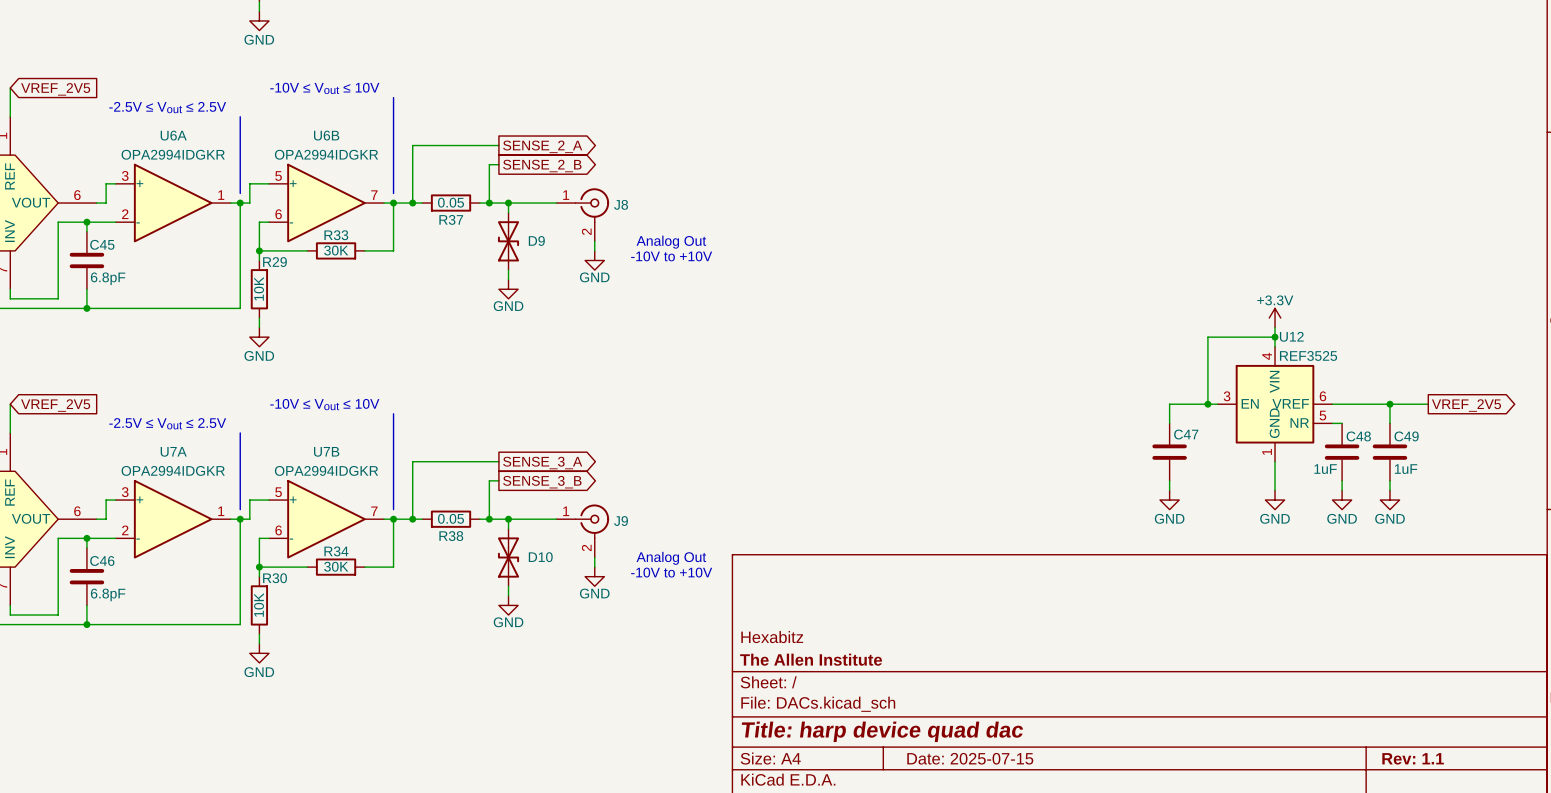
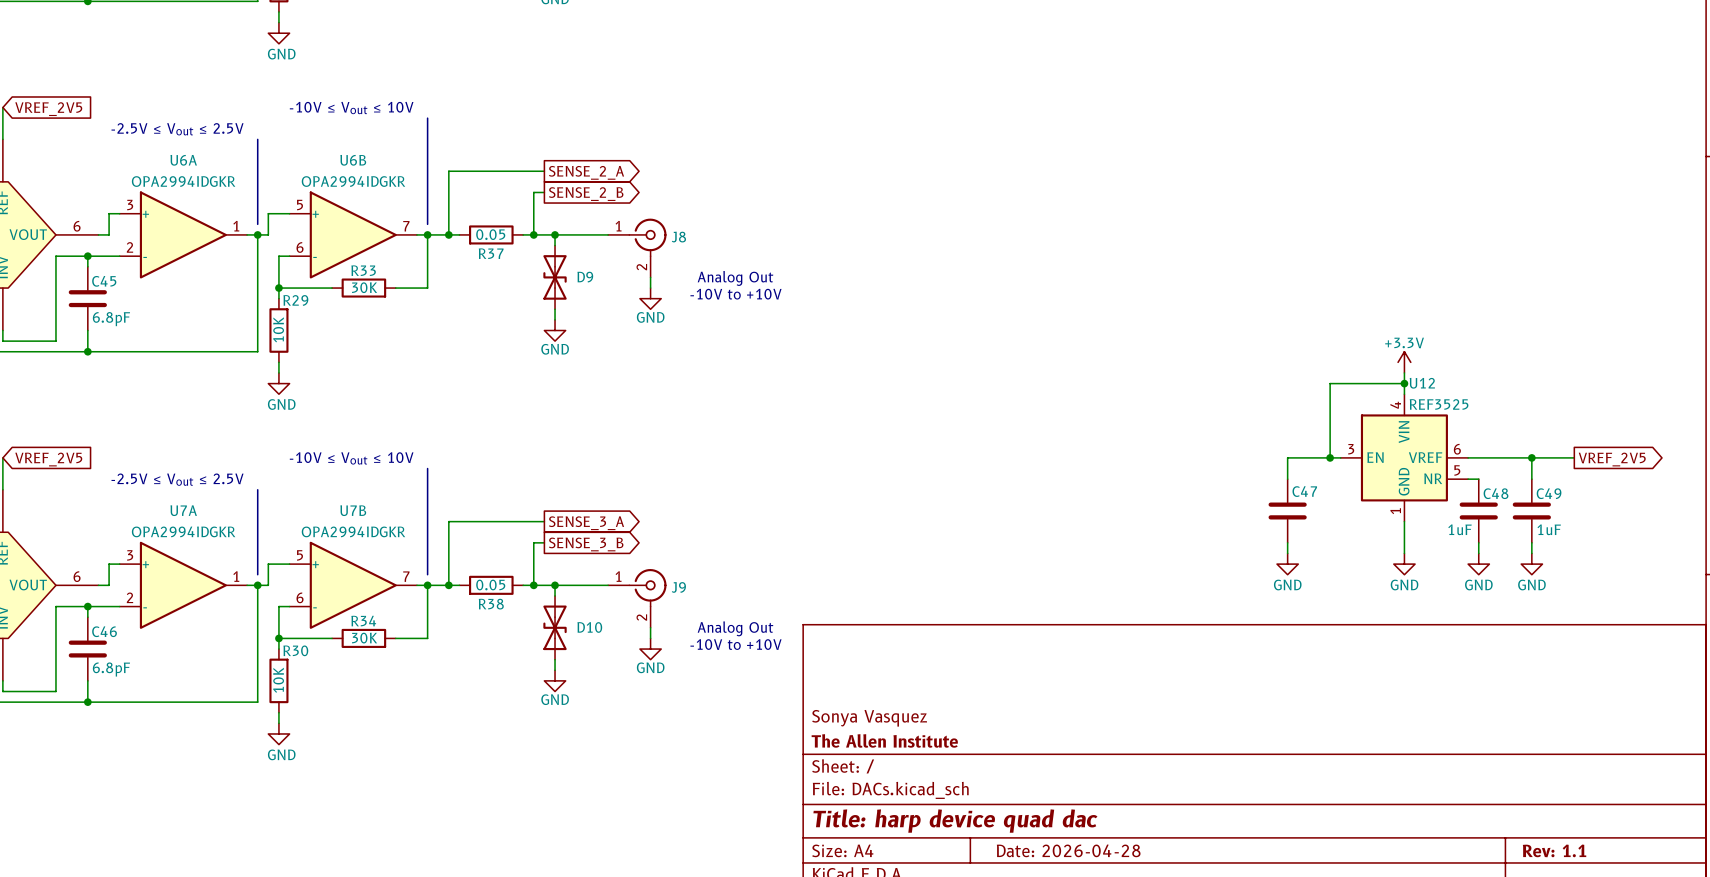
title block: Hexabitz (772, 637) -> Sonya Vasquez (869, 718)
title block: Date: 2025-07-15 (970, 758) -> Date: 2026-04-28 (1068, 850)

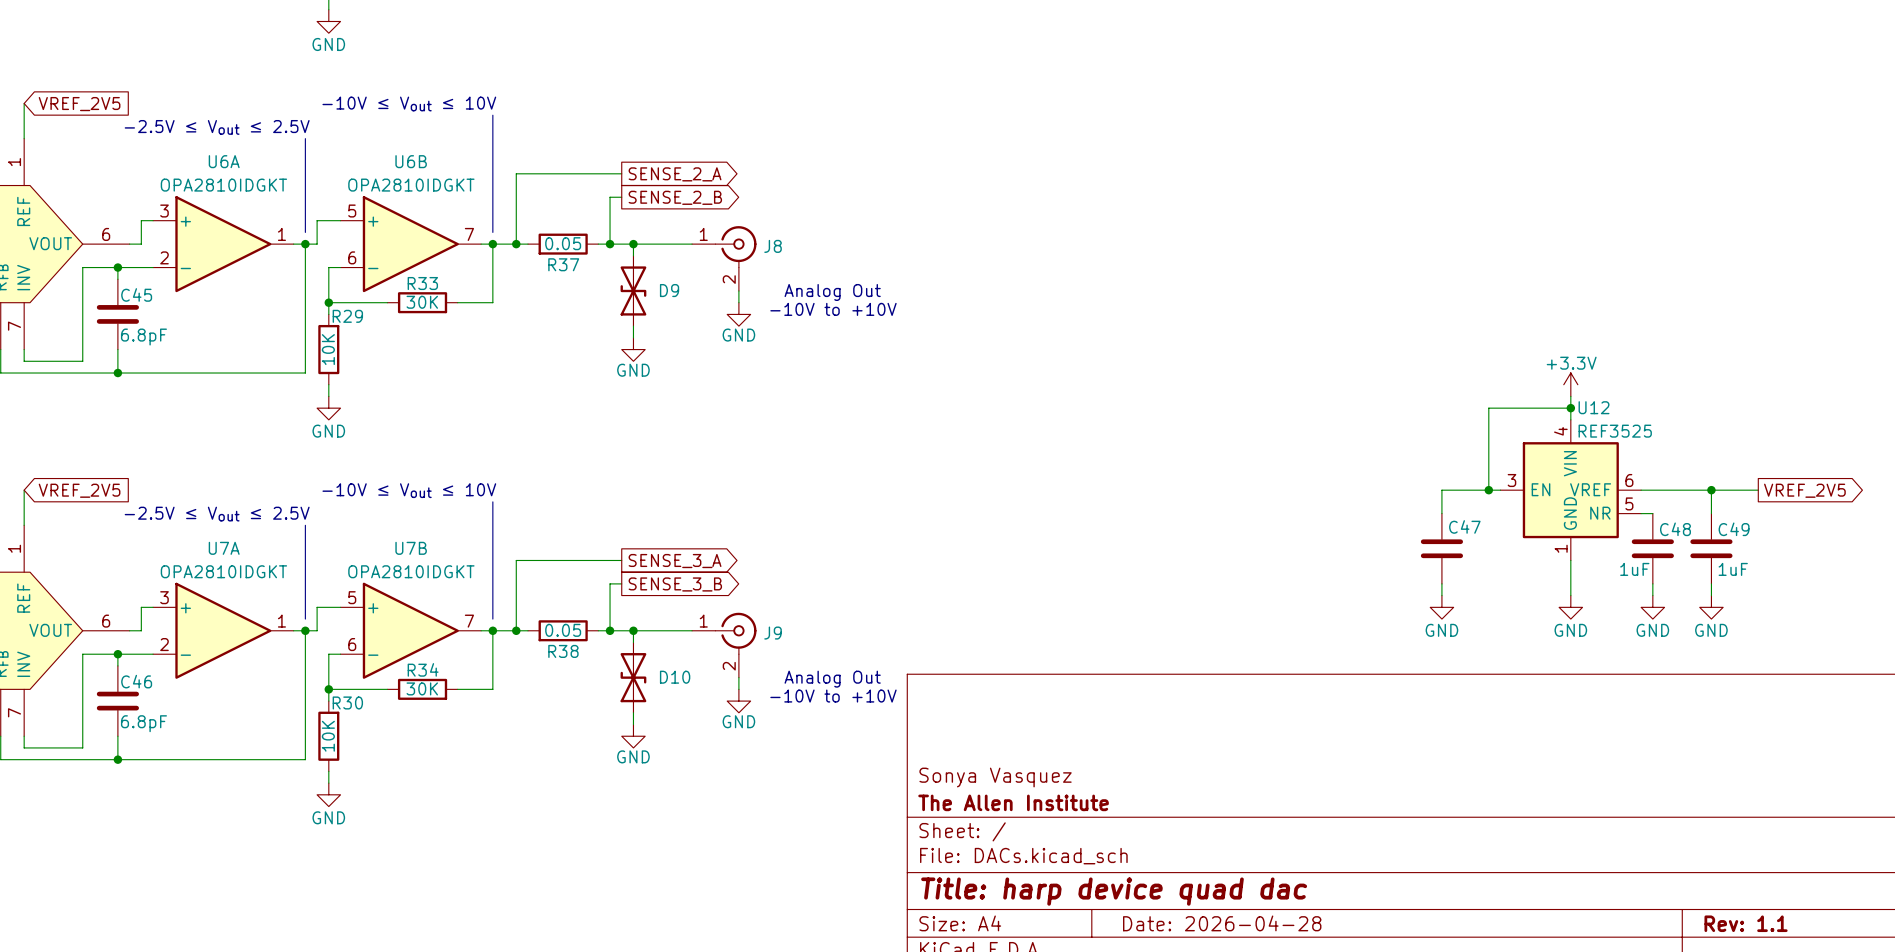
U6A value: OPA2994IDGKR (183, 181) -> OPA2810IDGKT (223, 185)
U6B value: OPA2994IDGKR (353, 181) -> OPA2810IDGKT (411, 185)
U7A value: OPA2994IDGKR (183, 531) -> OPA2810IDGKT (223, 571)
U7B value: OPA2994IDGKR (353, 531) -> OPA2810IDGKT (411, 571)

